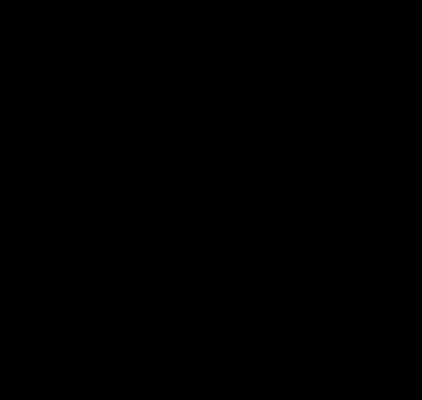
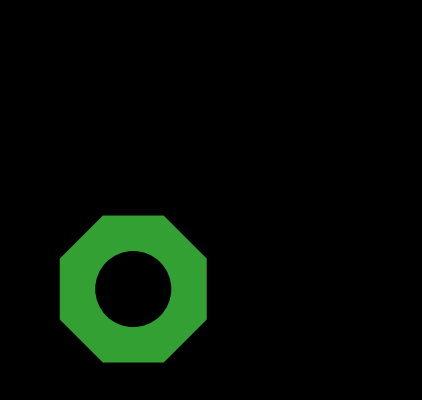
part: none -> (133, 289)

